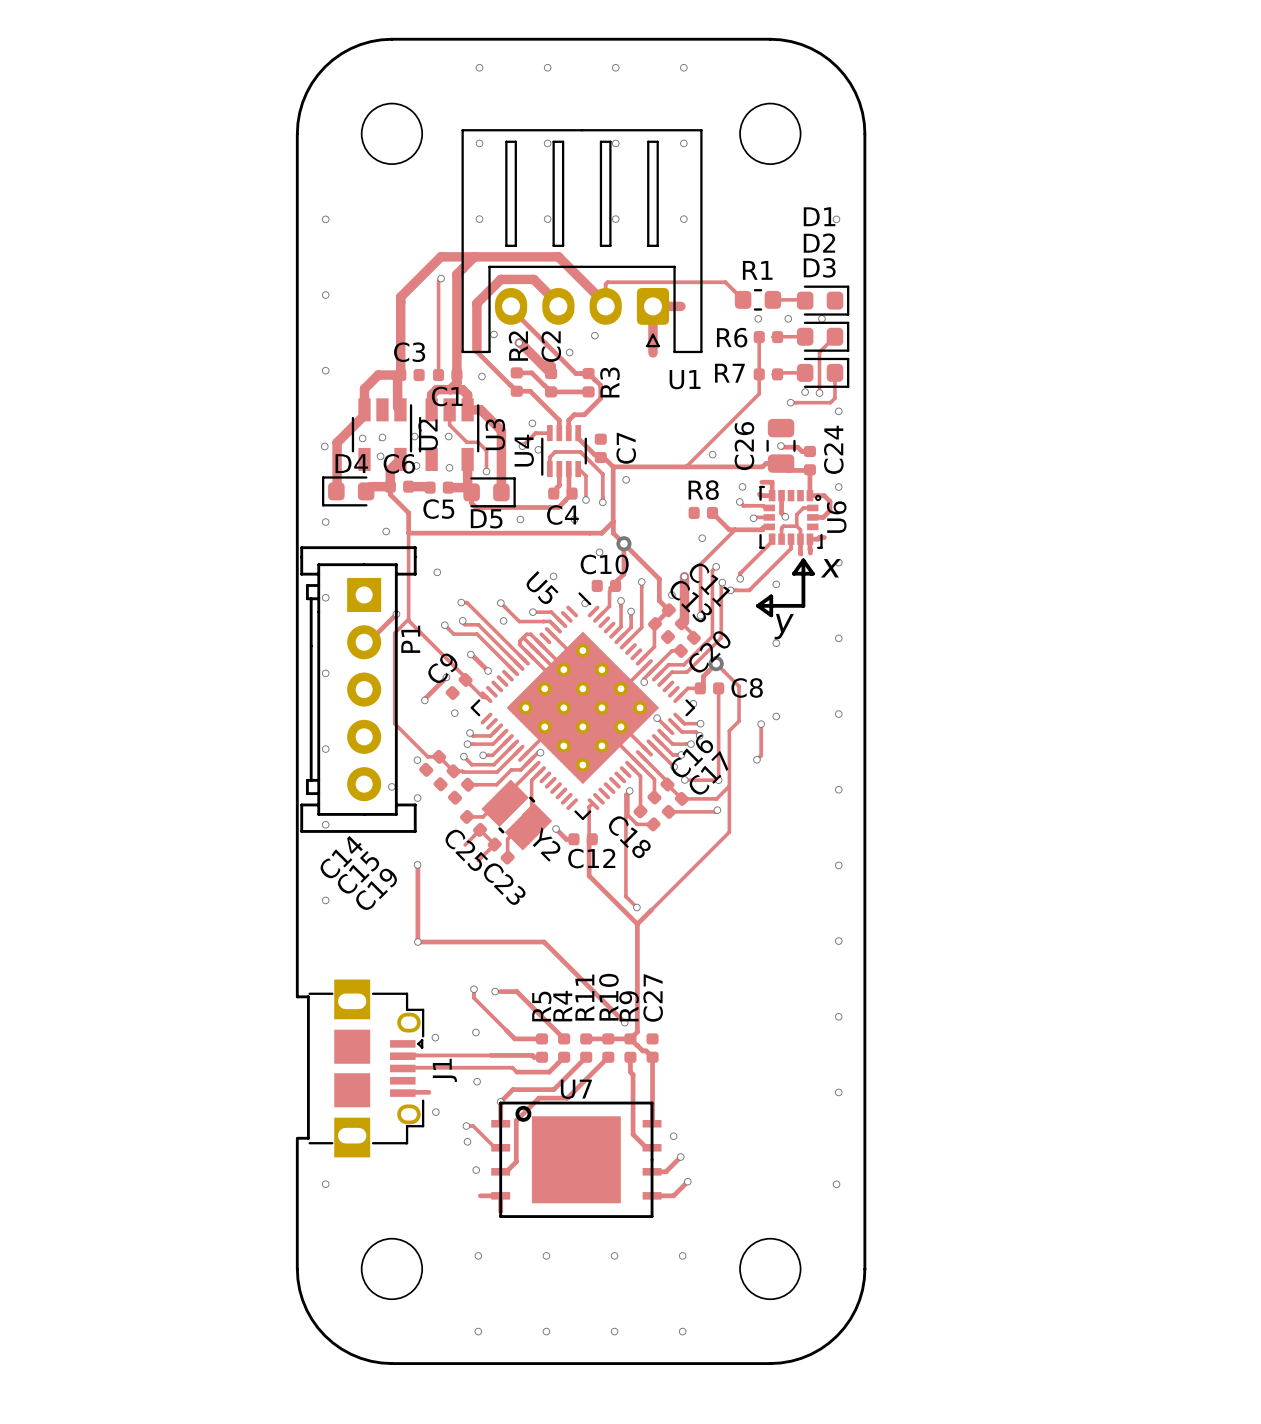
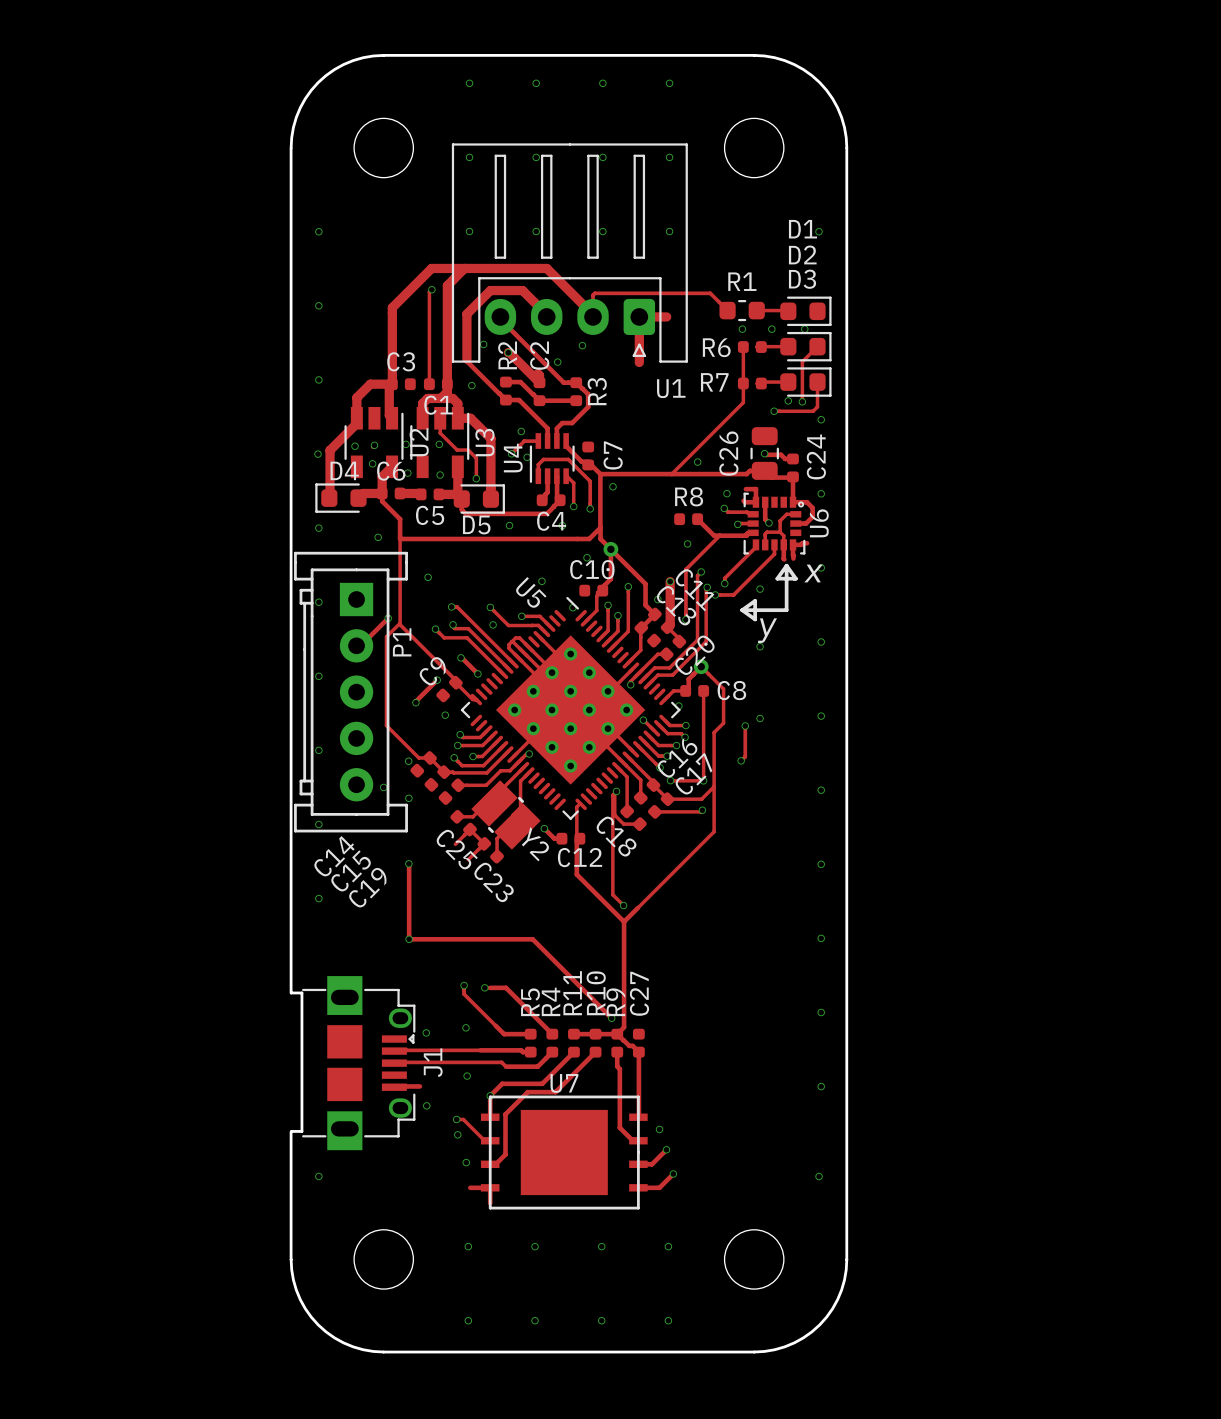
drawing: [515, 1105, 532, 1122] -> none

